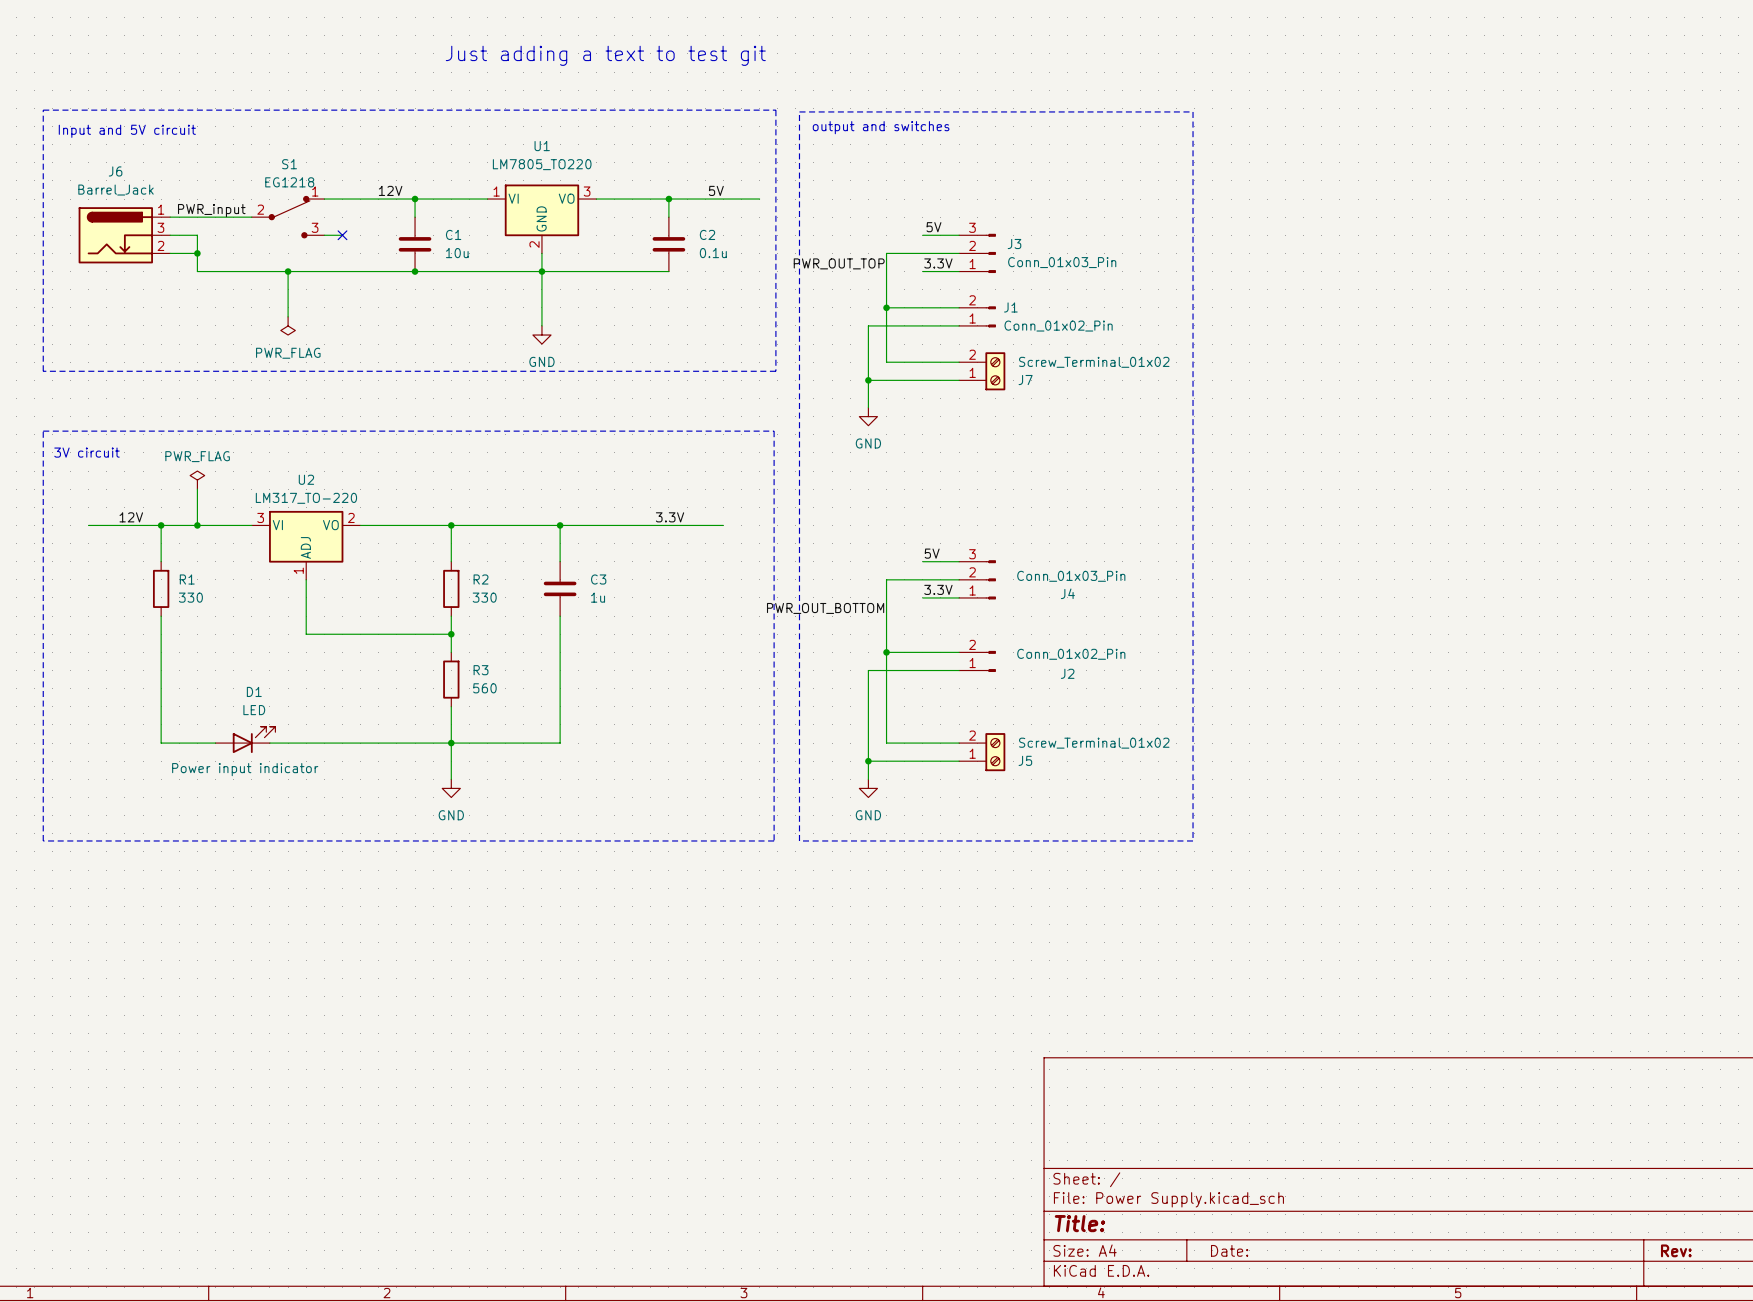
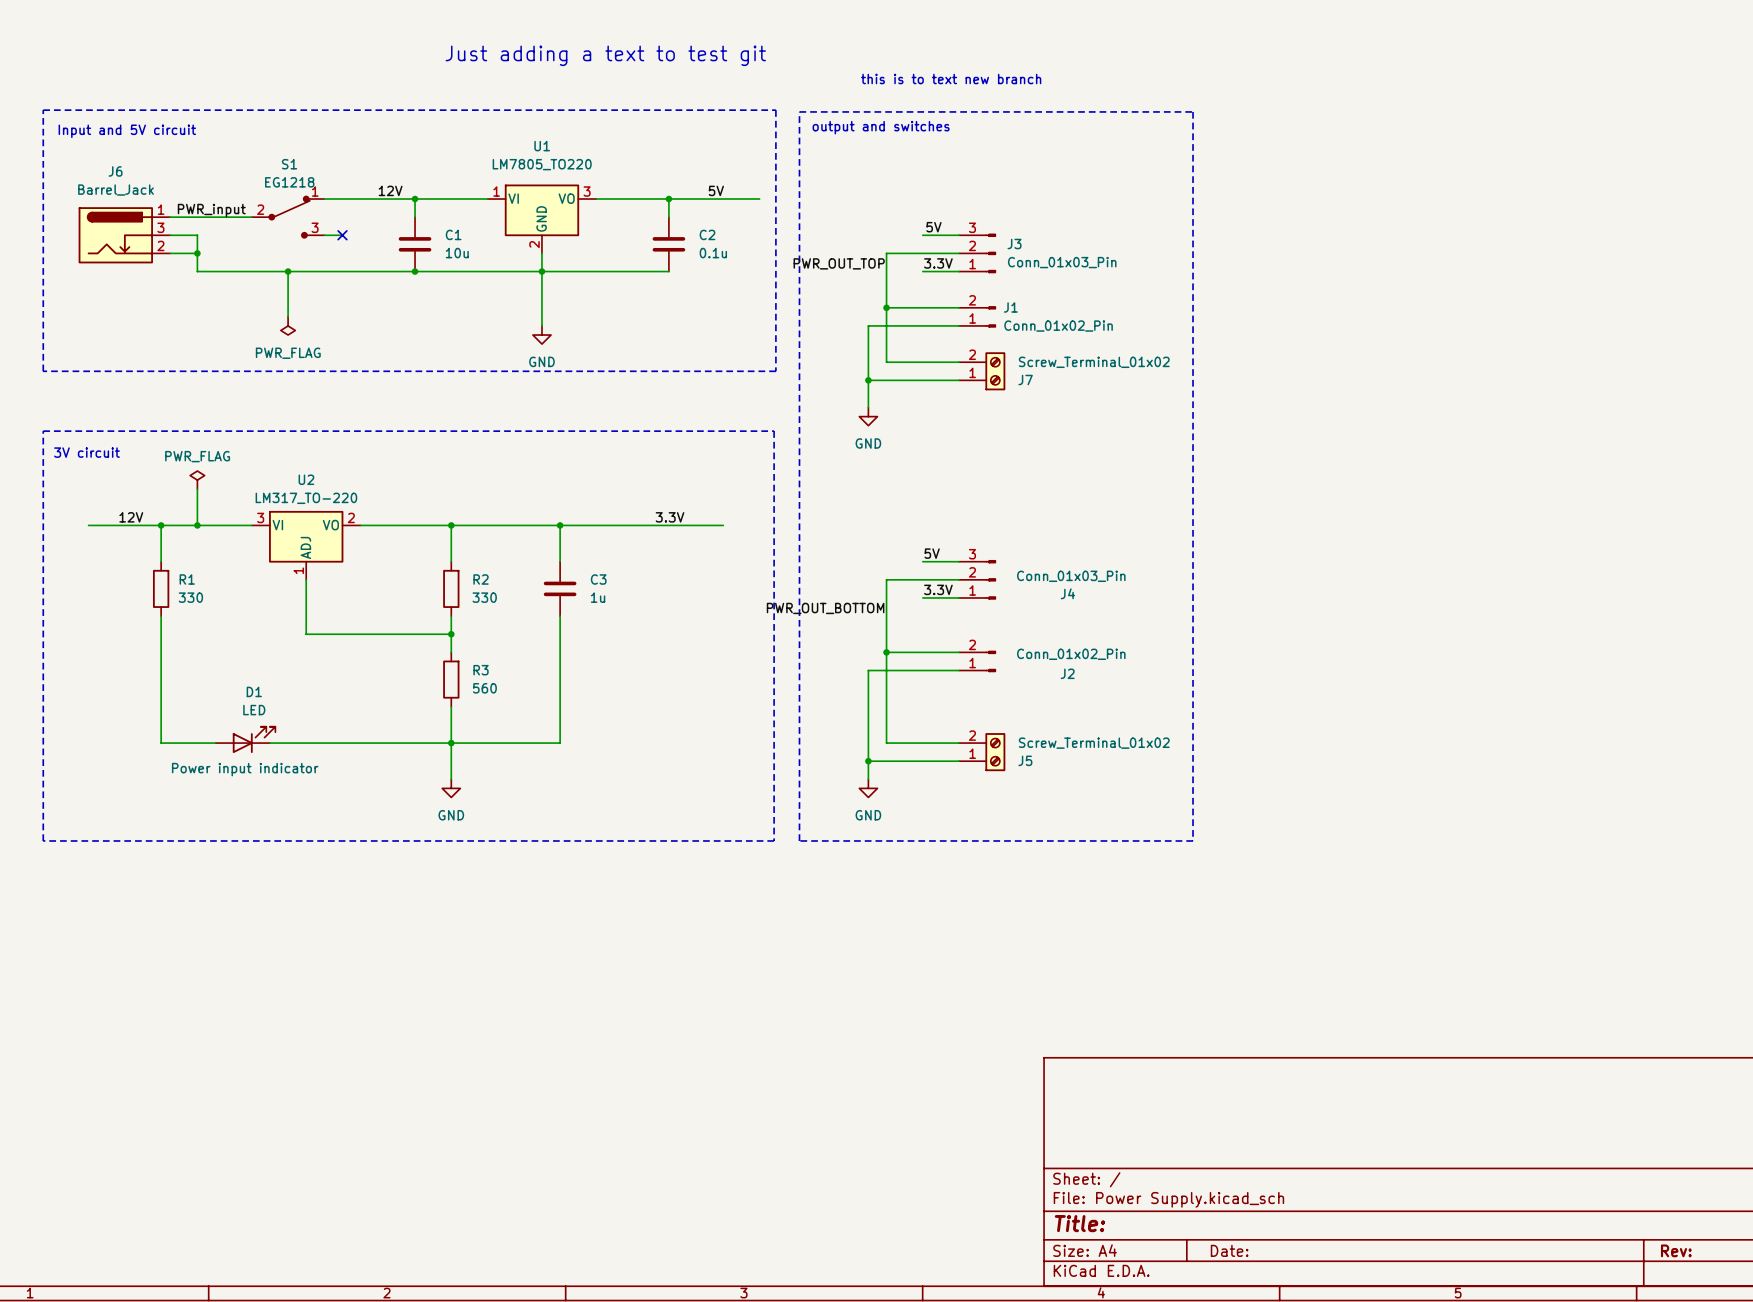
text: none -> this is to text new branch (951, 79)

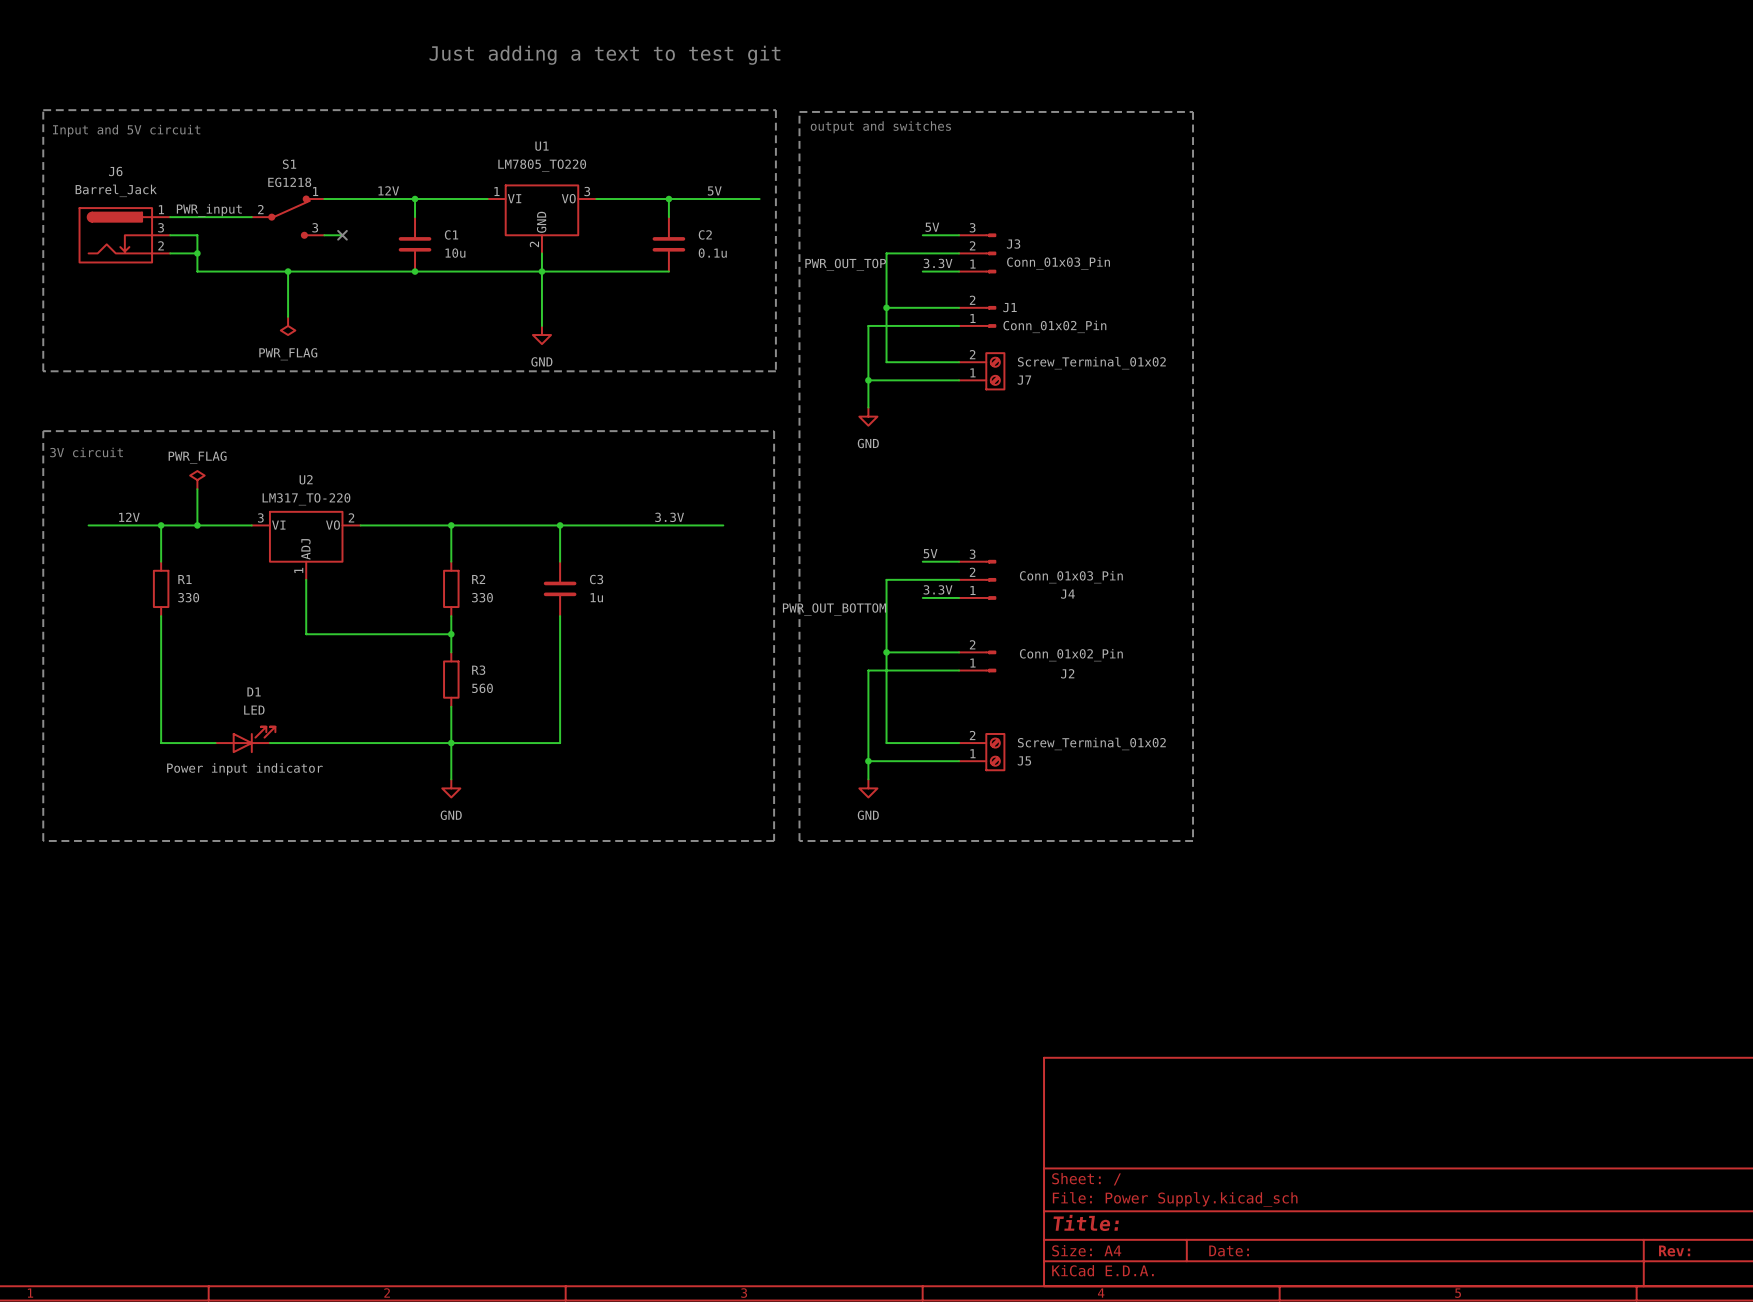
text: this is to text new branch (951, 79) -> none

